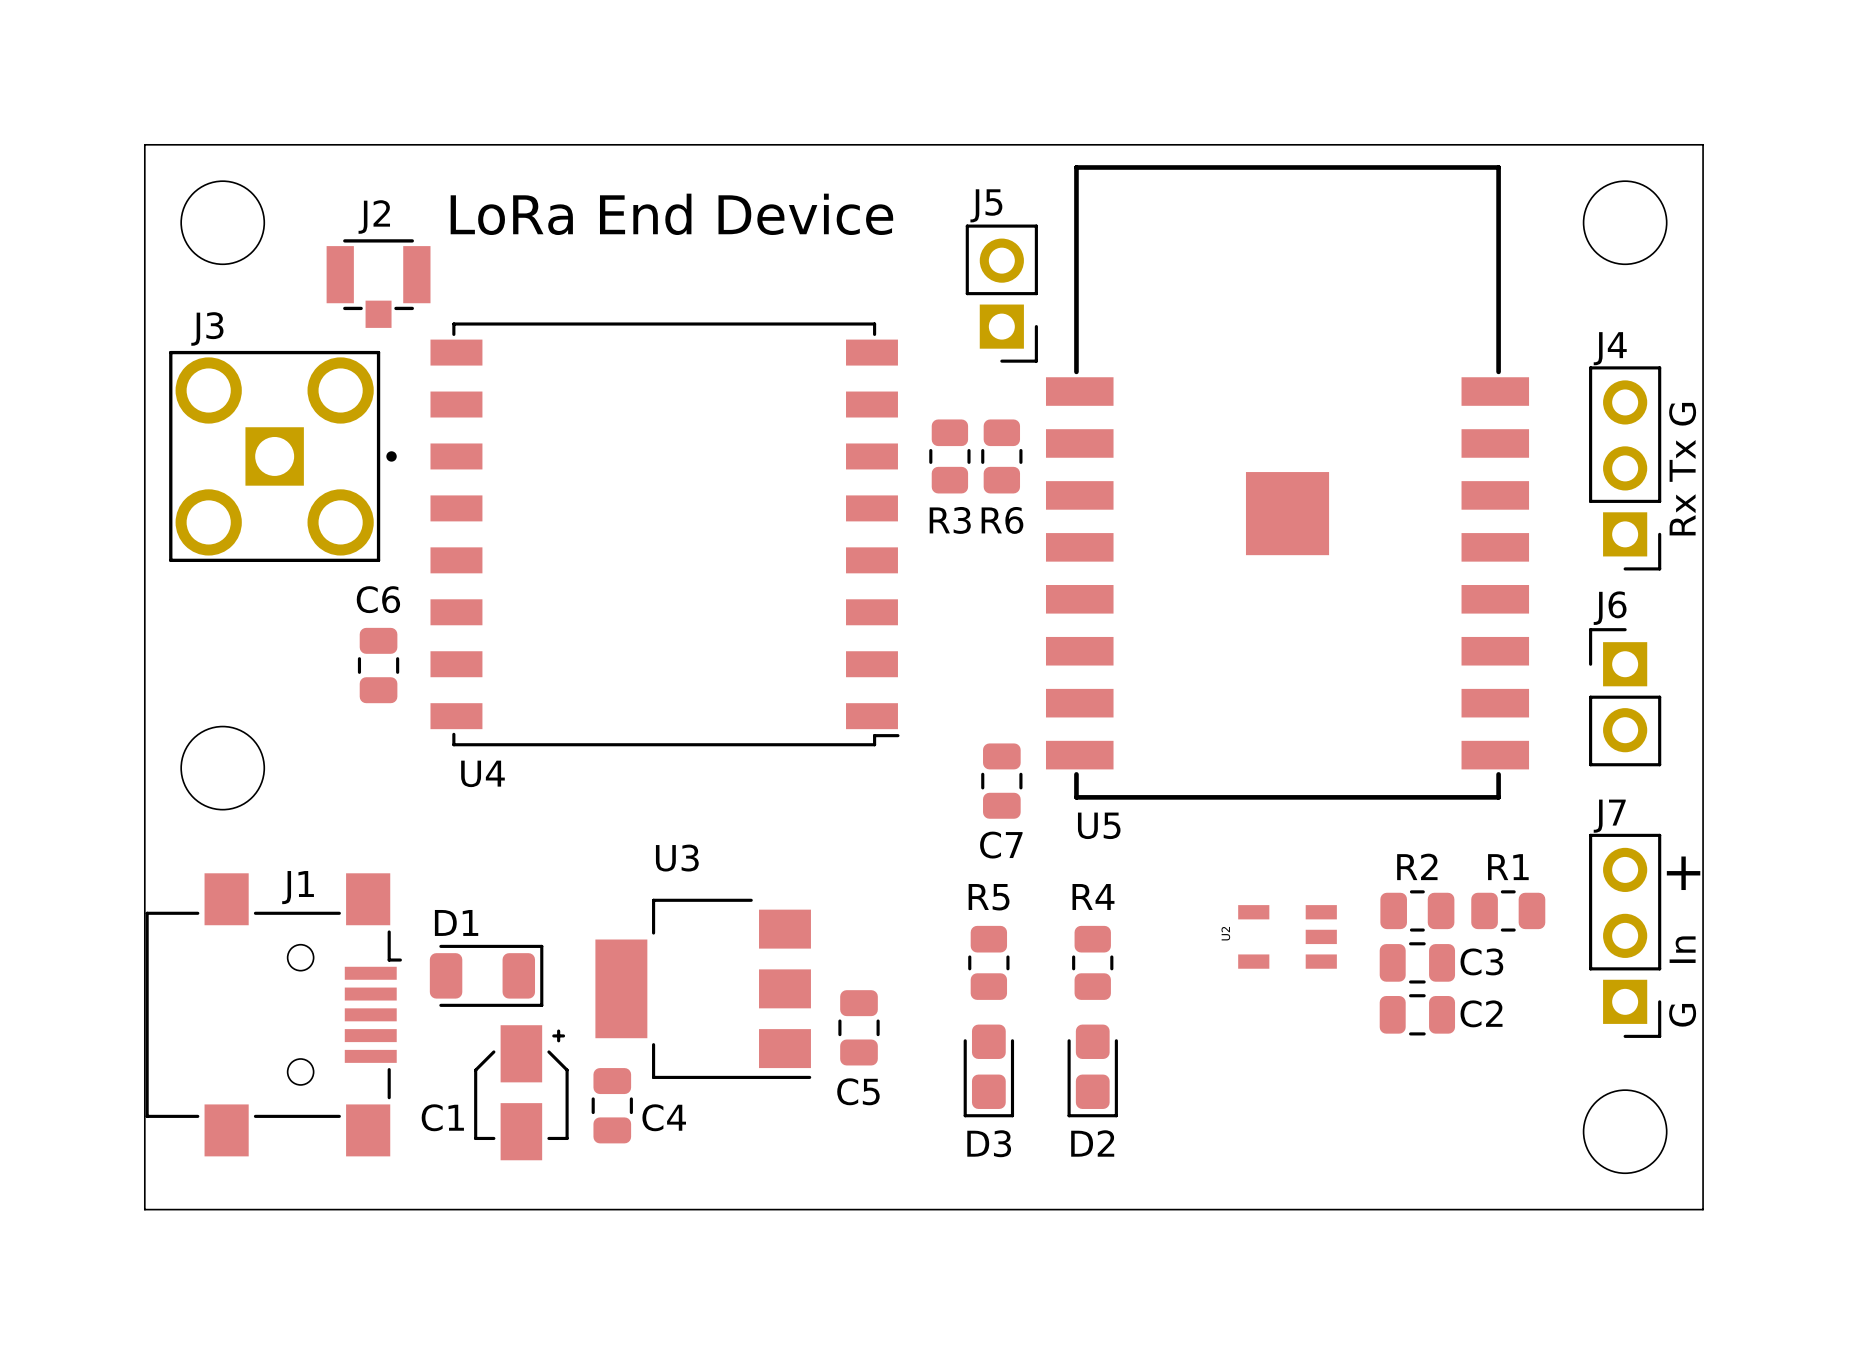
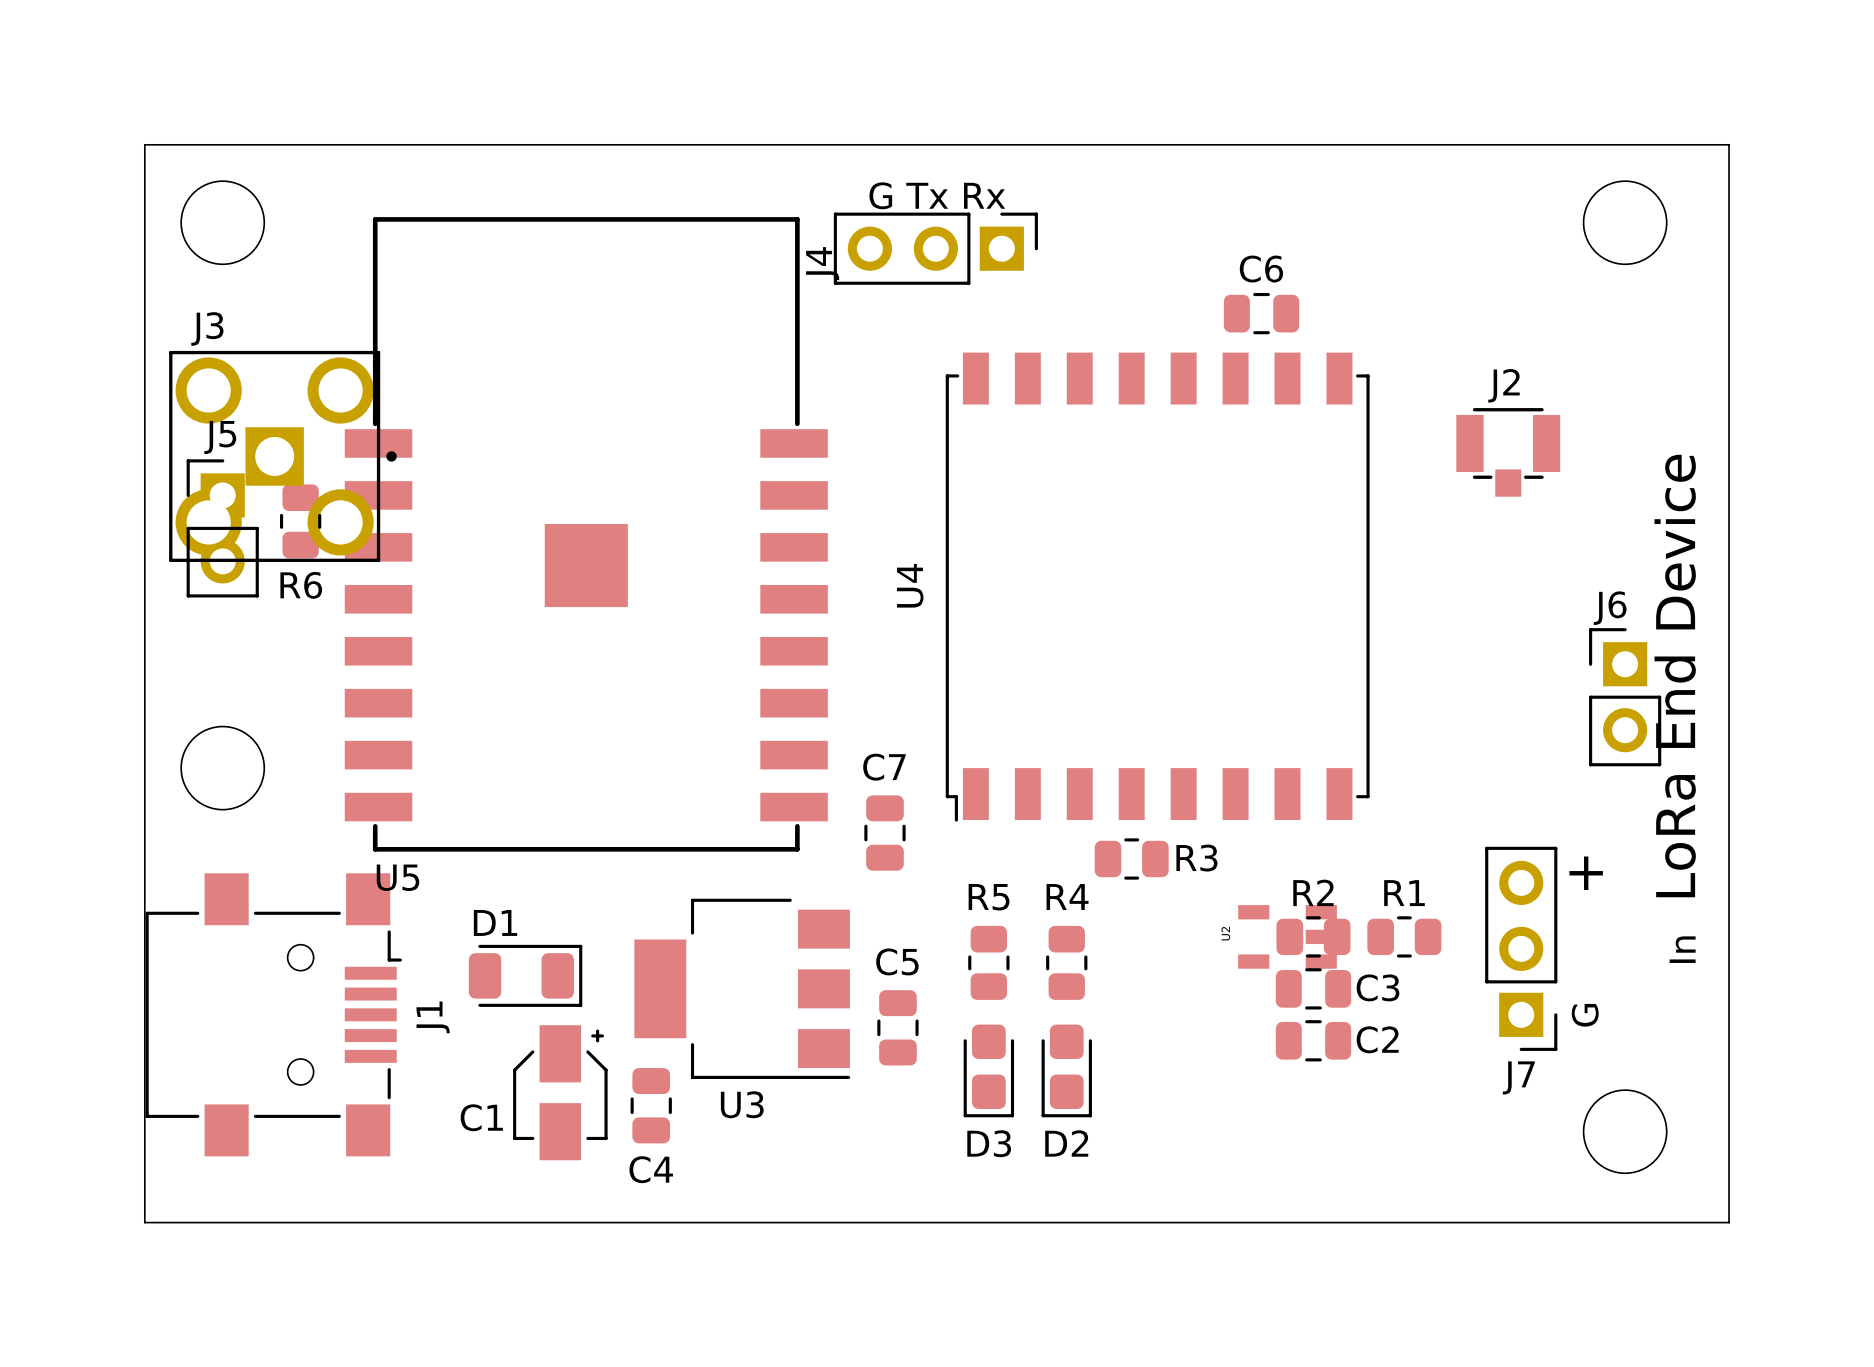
board edge: (1703, 144) (1703, 1209) (144, 1209) -> (1703, 144) (1729, 144) (1729, 1222) (144, 1222) (144, 1209)
text: none -> G Tx Rx (937, 195)
text: LoRa End Device (671, 214) -> none
J2 position: (378, 283) -> (1508, 452)
J5 rotation: 0° (1001, 293) -> 180° (222, 528)
J5 position: (1001, 293) -> (222, 528)
R3 rotation: 0° (949, 456) -> 90° clockwise (1131, 859)
R3 position: (949, 456) -> (1131, 859)
R6 position: (1001, 456) -> (300, 521)
J4 rotation: 0° (1625, 468) -> 90° counterclockwise (935, 248)
J4 position: (1625, 468) -> (935, 248)
text: Rx Tx G (1682, 469) -> none
U5 position: (1287, 482) -> (586, 534)
R3 name position: R3 (950, 520) -> R3 (1196, 858)
U4 rotation: 0° (665, 534) -> 90° clockwise (1157, 587)
U4 position: (665, 534) -> (1157, 587)
C6 rotation: 0° (378, 665) -> 90° clockwise (1261, 313)
C6 position: (378, 665) -> (1261, 313)
text: none -> LoRa End Device (1675, 676)
U4 name position: U4 (482, 773) -> U4 (910, 585)
C7 position: (1001, 781) -> (884, 833)
J7 name position: J7 (1609, 816) -> J7 (1518, 1077)
C7 name position: C7 (1001, 845) -> C7 (884, 767)
U3 name position: U3 (677, 858) -> U3 (742, 1104)
text position: + (1683, 873) -> + (1586, 873)
J1 name rotation: 0° (298, 887) -> 90° counterclockwise (433, 1017)
J1 name position: J1 (298, 887) -> J1 (433, 1017)
R2 position: (1417, 910) -> (1313, 936)
R1 position: (1508, 910) -> (1404, 936)
J7 position: (1625, 935) -> (1521, 948)
R4 position: (1092, 962) -> (1066, 962)
C3 position: (1417, 962) -> (1313, 988)
D1 position: (486, 975) -> (525, 975)
U3 position: (703, 988) -> (742, 988)
C2 position: (1417, 1014) -> (1313, 1040)
text position: G (1682, 1015) -> G (1585, 1015)
C5 position: (859, 1027) -> (897, 1027)
D2 position: (1092, 1070) -> (1066, 1070)
C5 name position: C5 (858, 1091) -> C5 (897, 961)
C1 position: (521, 1092) -> (560, 1092)
C4 position: (612, 1105) -> (651, 1105)
C4 name position: C4 (664, 1117) -> C4 (651, 1169)

